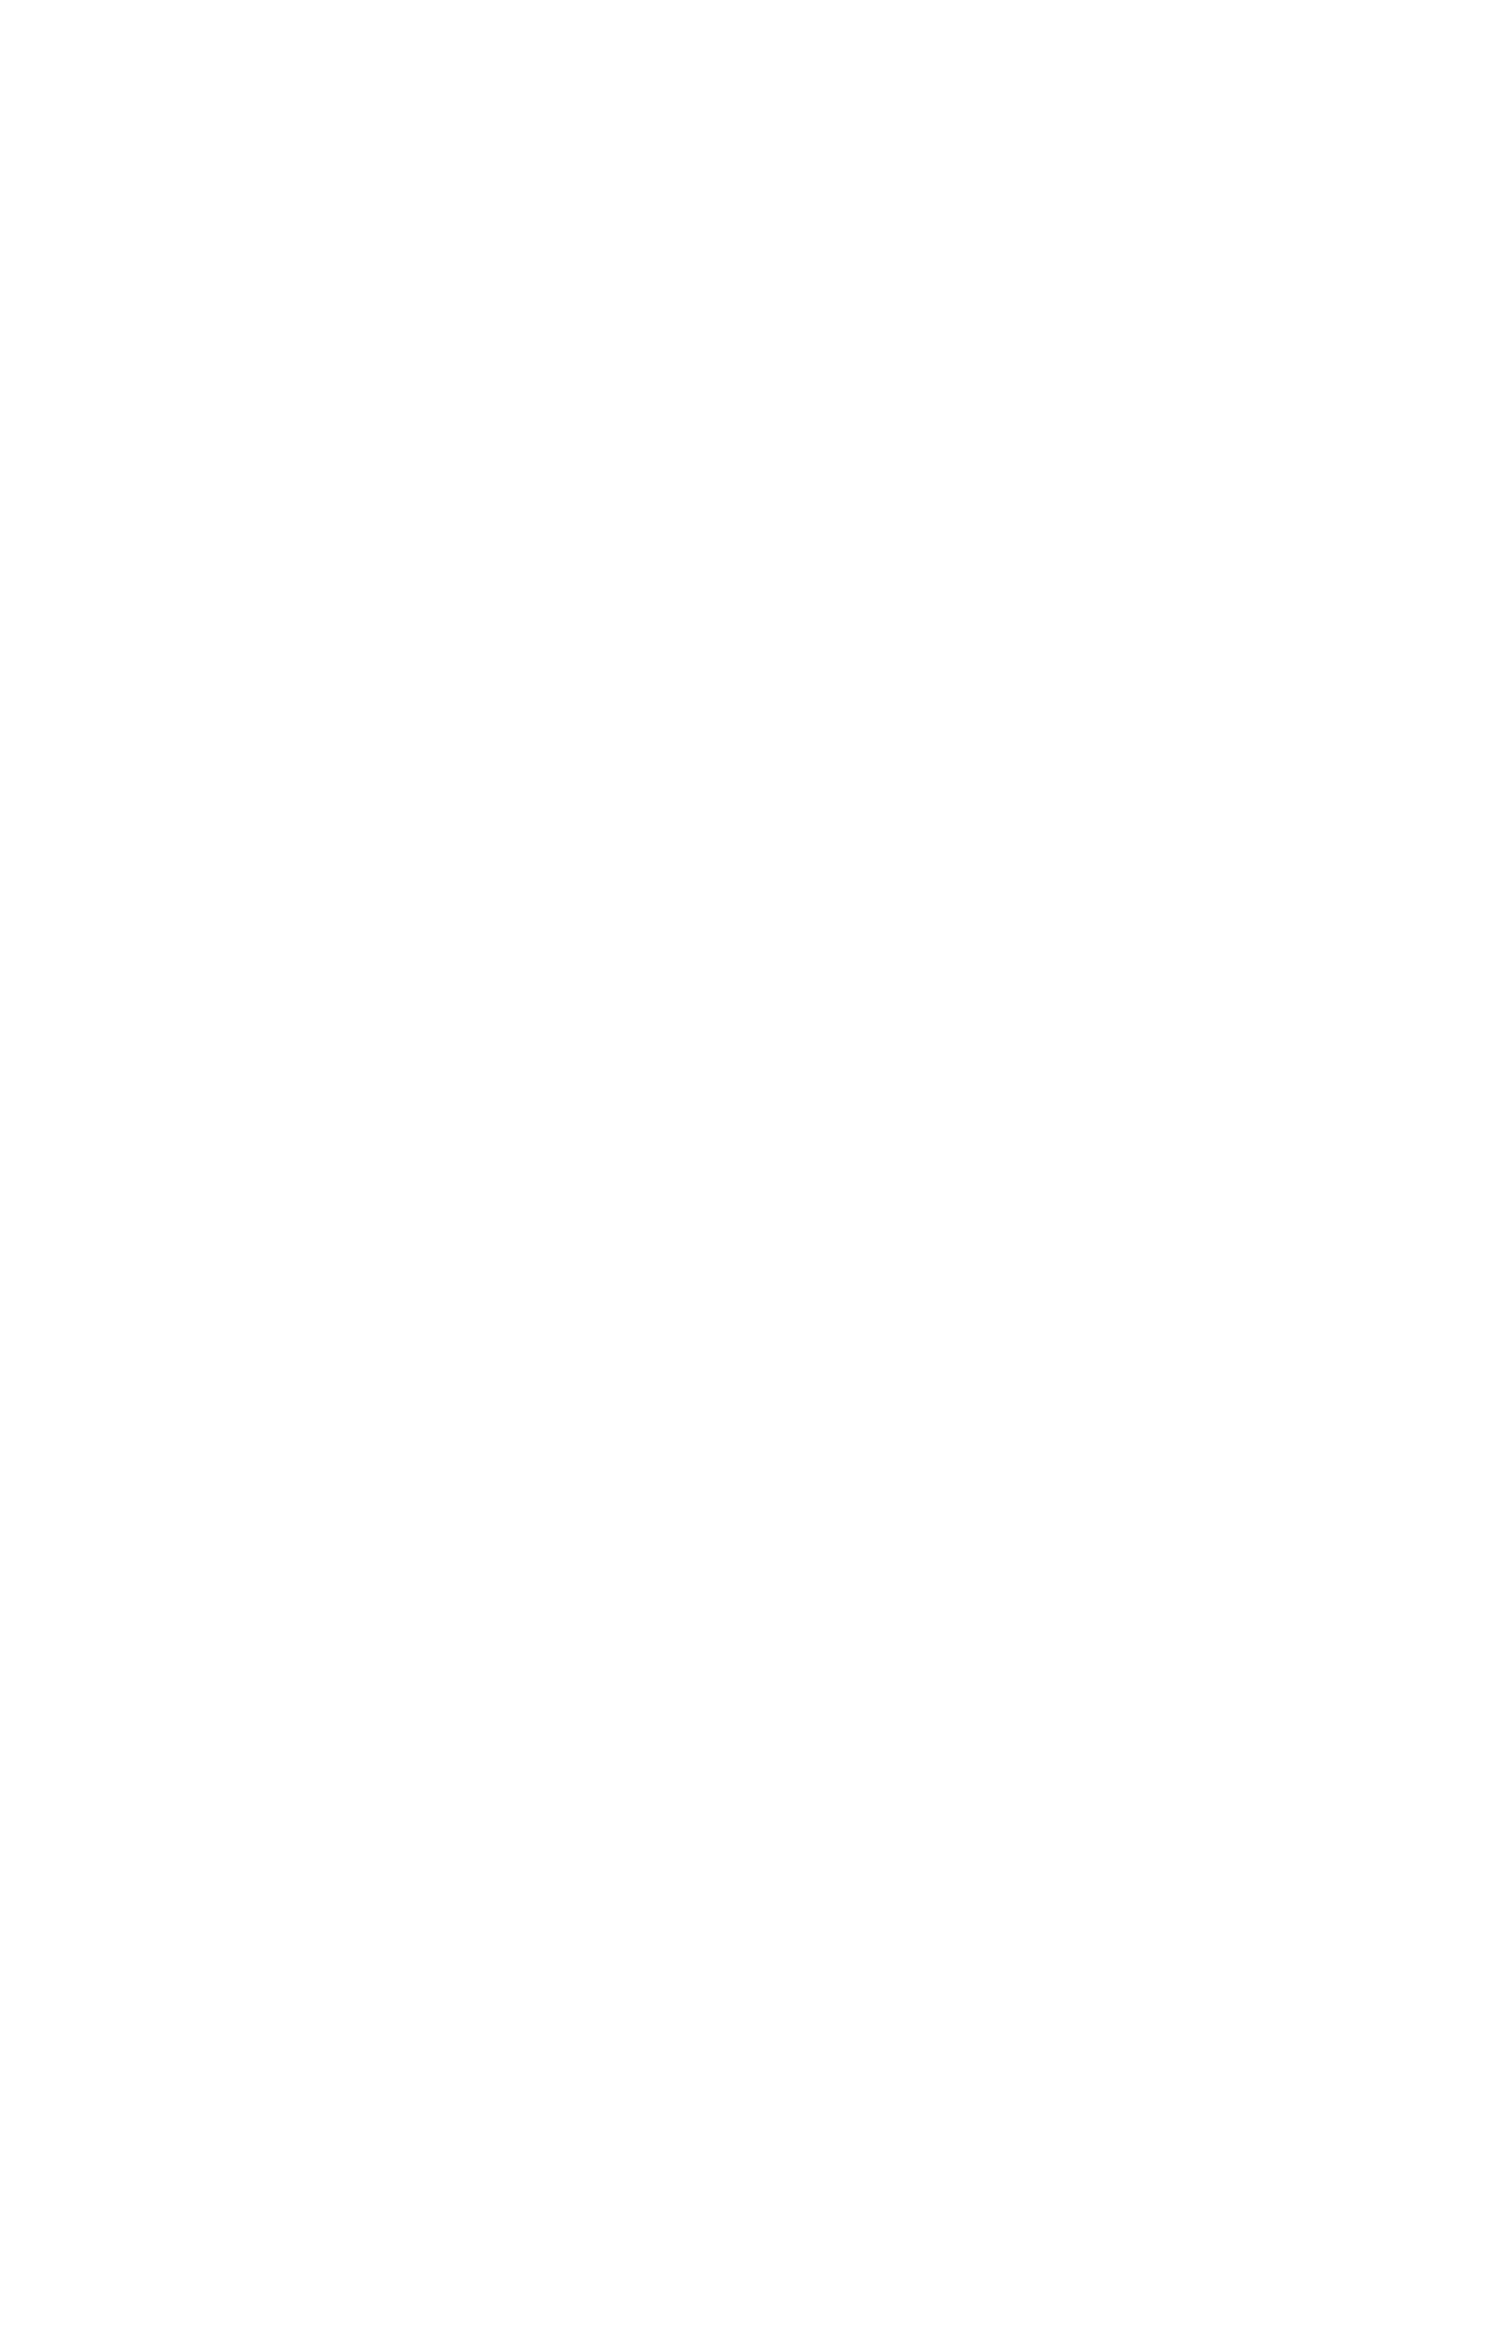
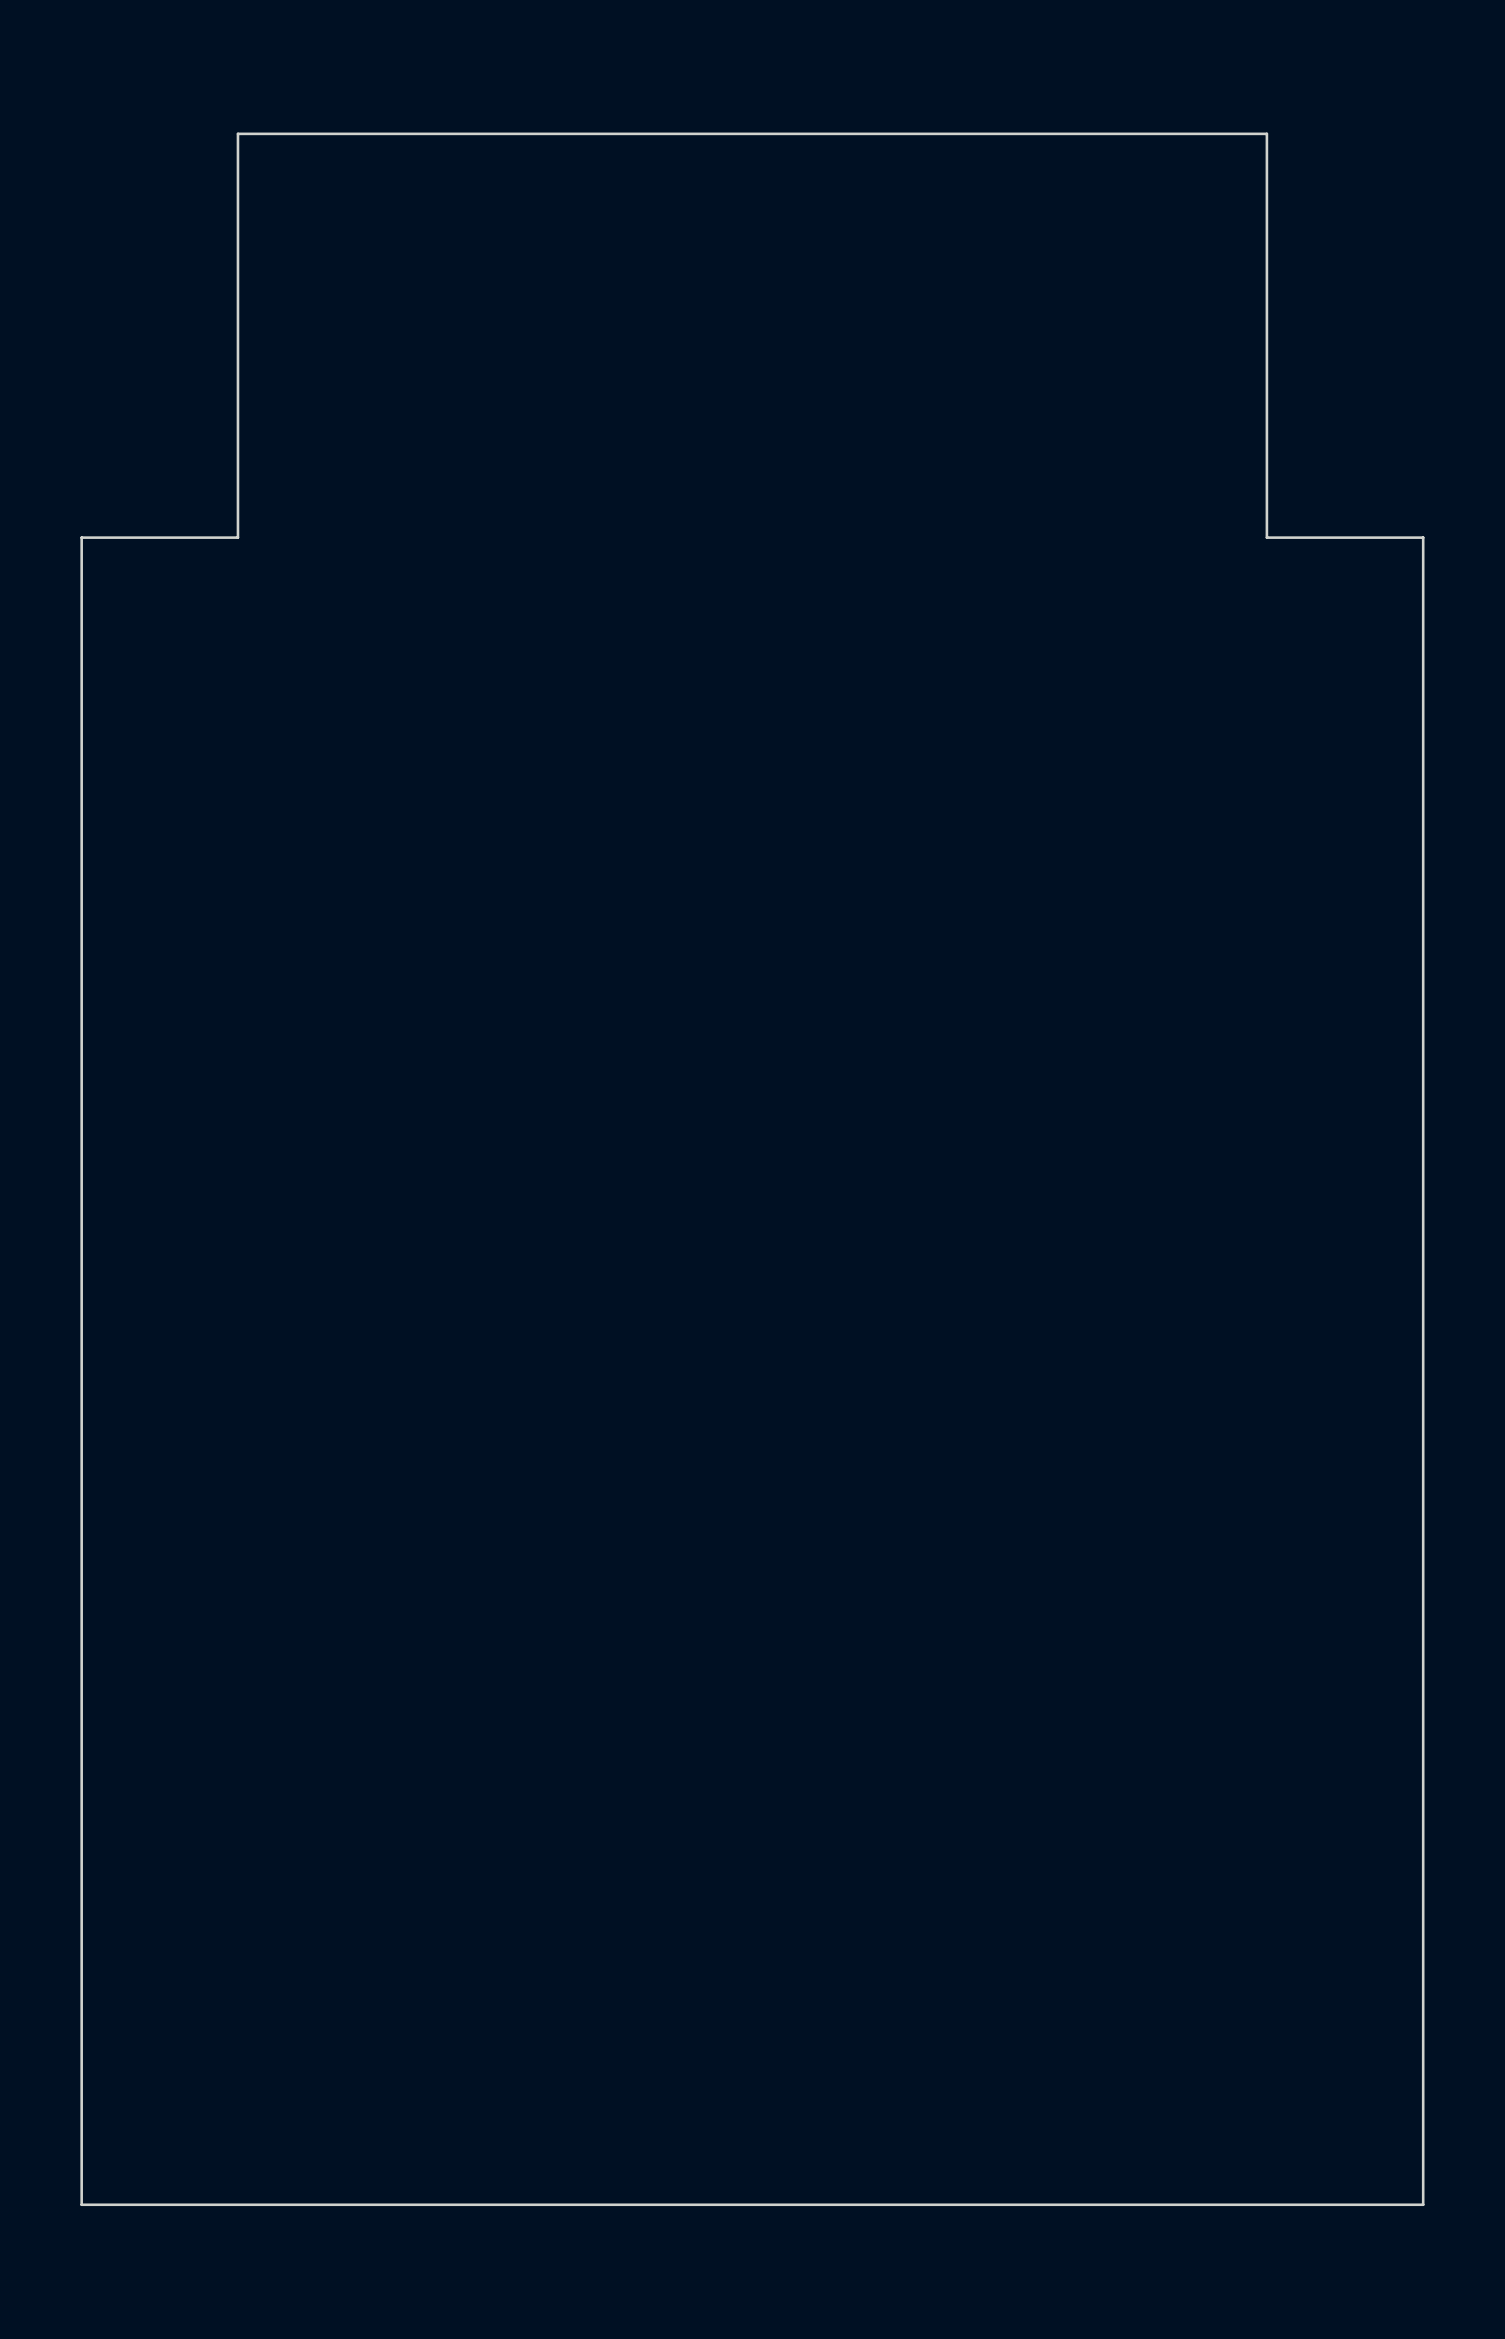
board edge: none -> (237, 133) (1266, 133) (1266, 537) (1423, 537) (1423, 2204) (81, 2204) (81, 537) (237, 537) (237, 133)

